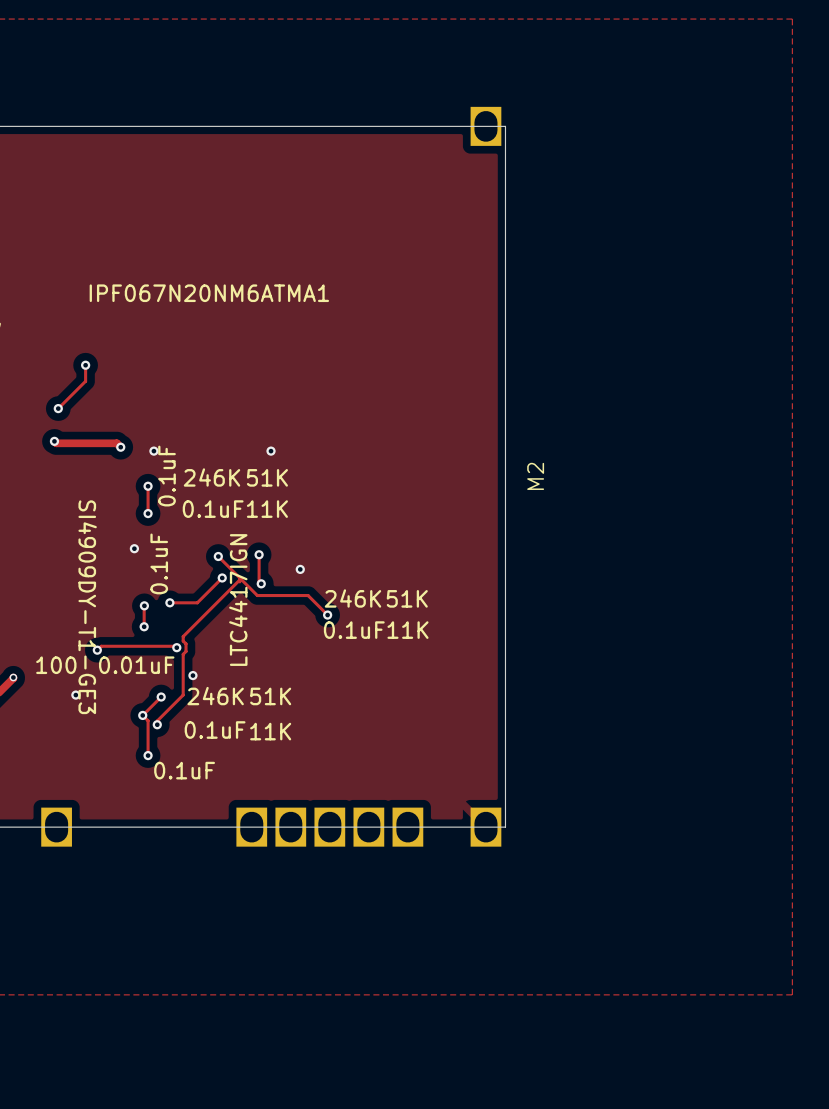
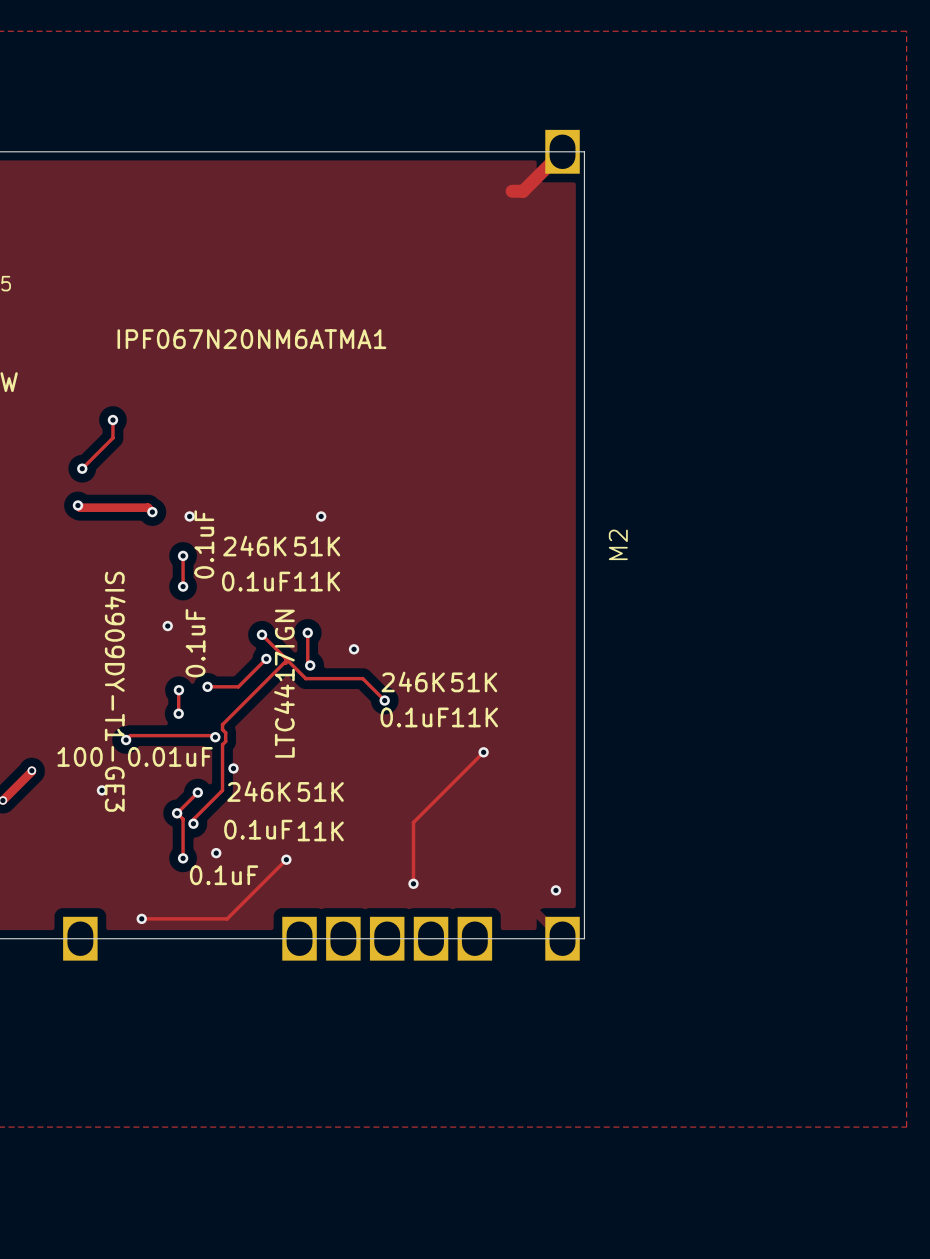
track: none -> (562, 151) (523, 191) (512, 191)
track: none -> (483, 752) (413, 822) (413, 883)
via: none -> (483, 752)
via: none -> (216, 853)
track: none -> (286, 859) (227, 918) (141, 918)
via: none -> (286, 859)
via: none -> (413, 883)
via: none -> (555, 890)
via: none -> (141, 918)

